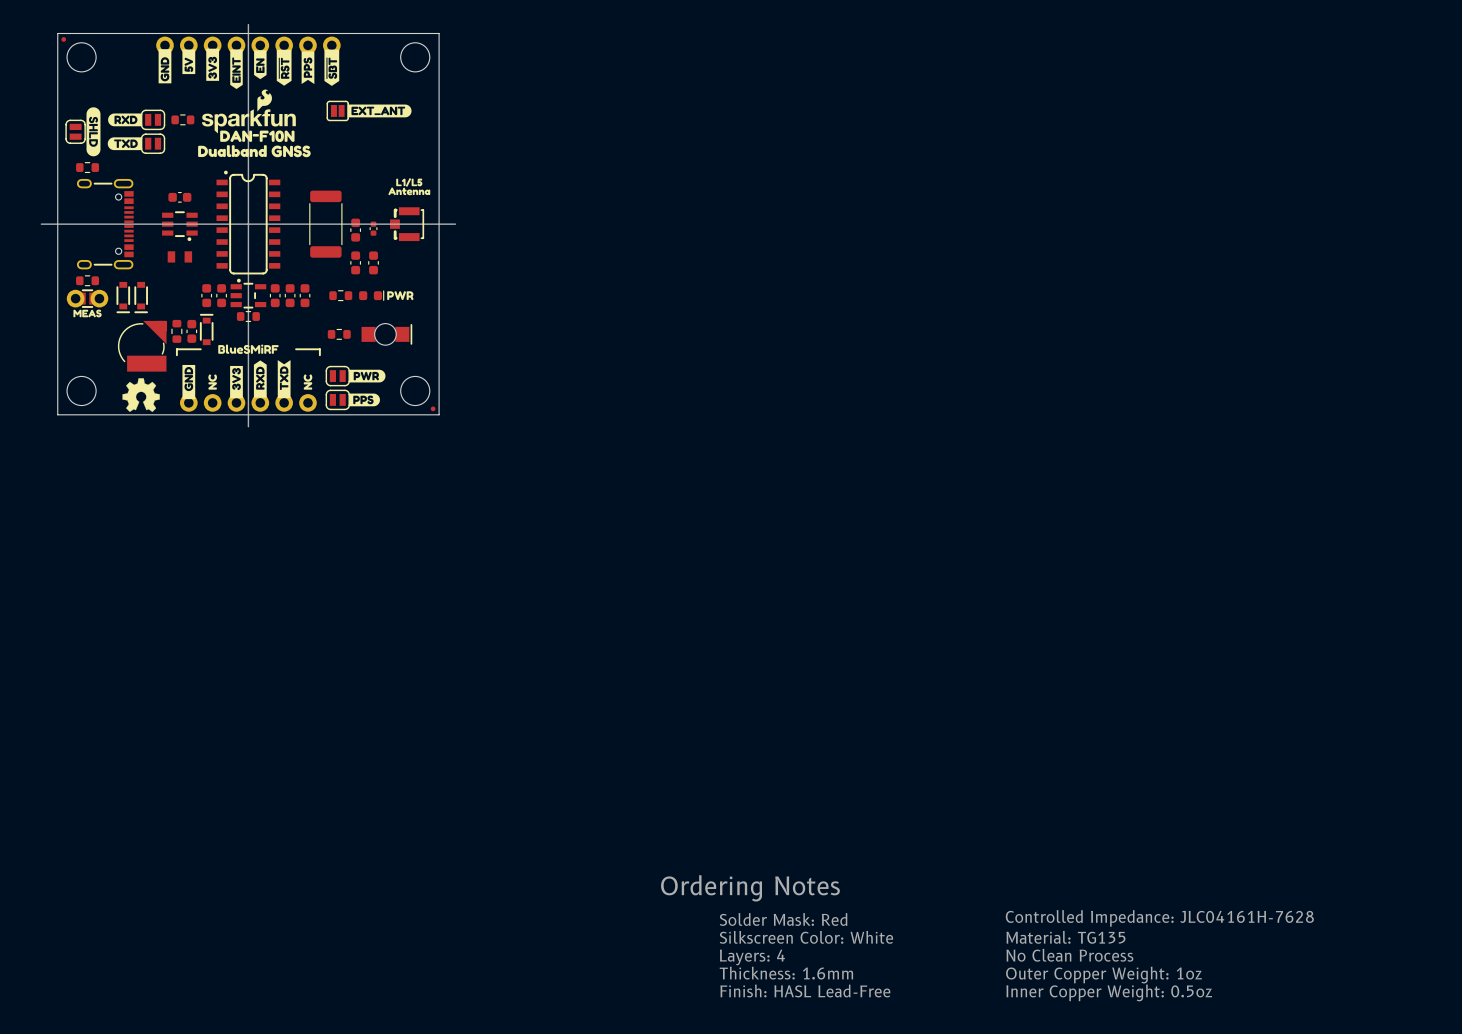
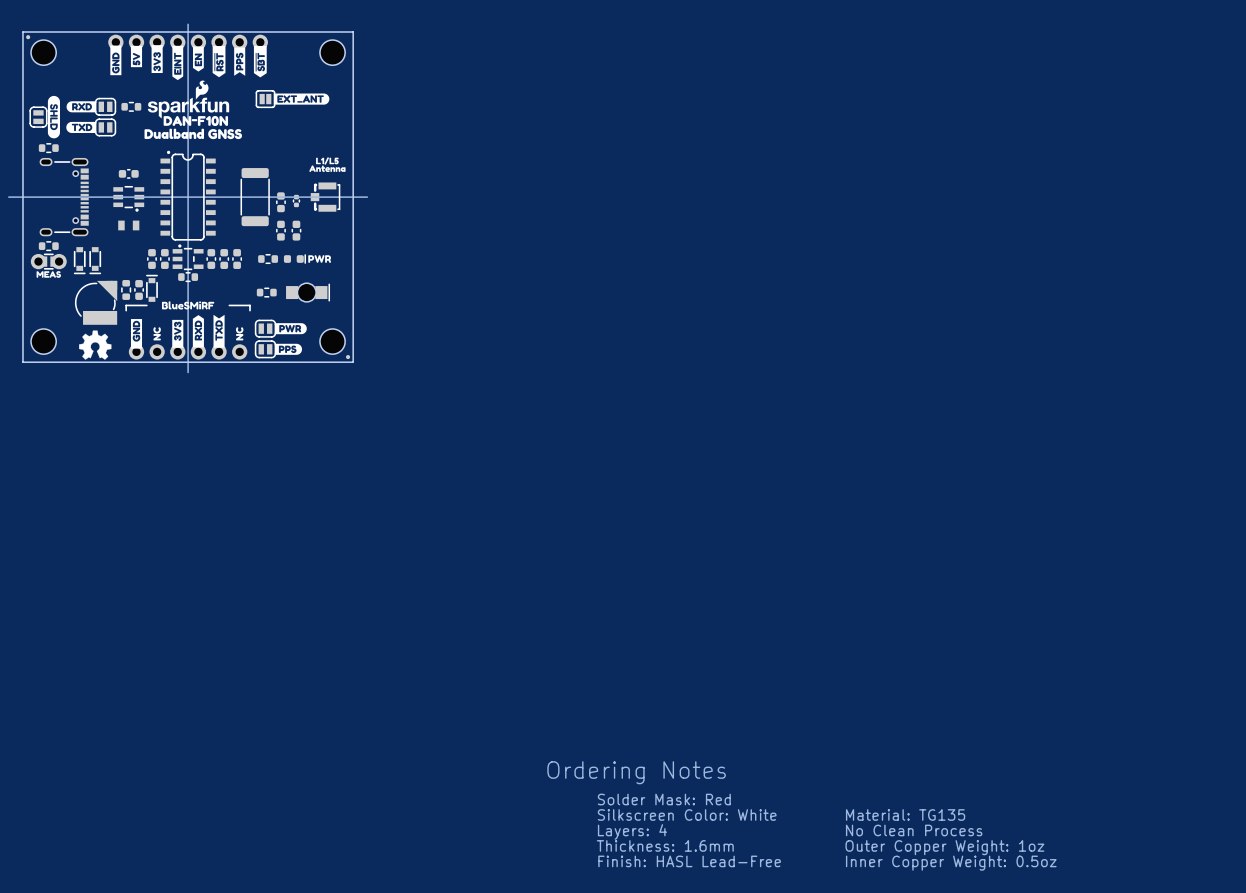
text: Controlled Impedance: JLC04161H-7628 (1159, 918) -> none

